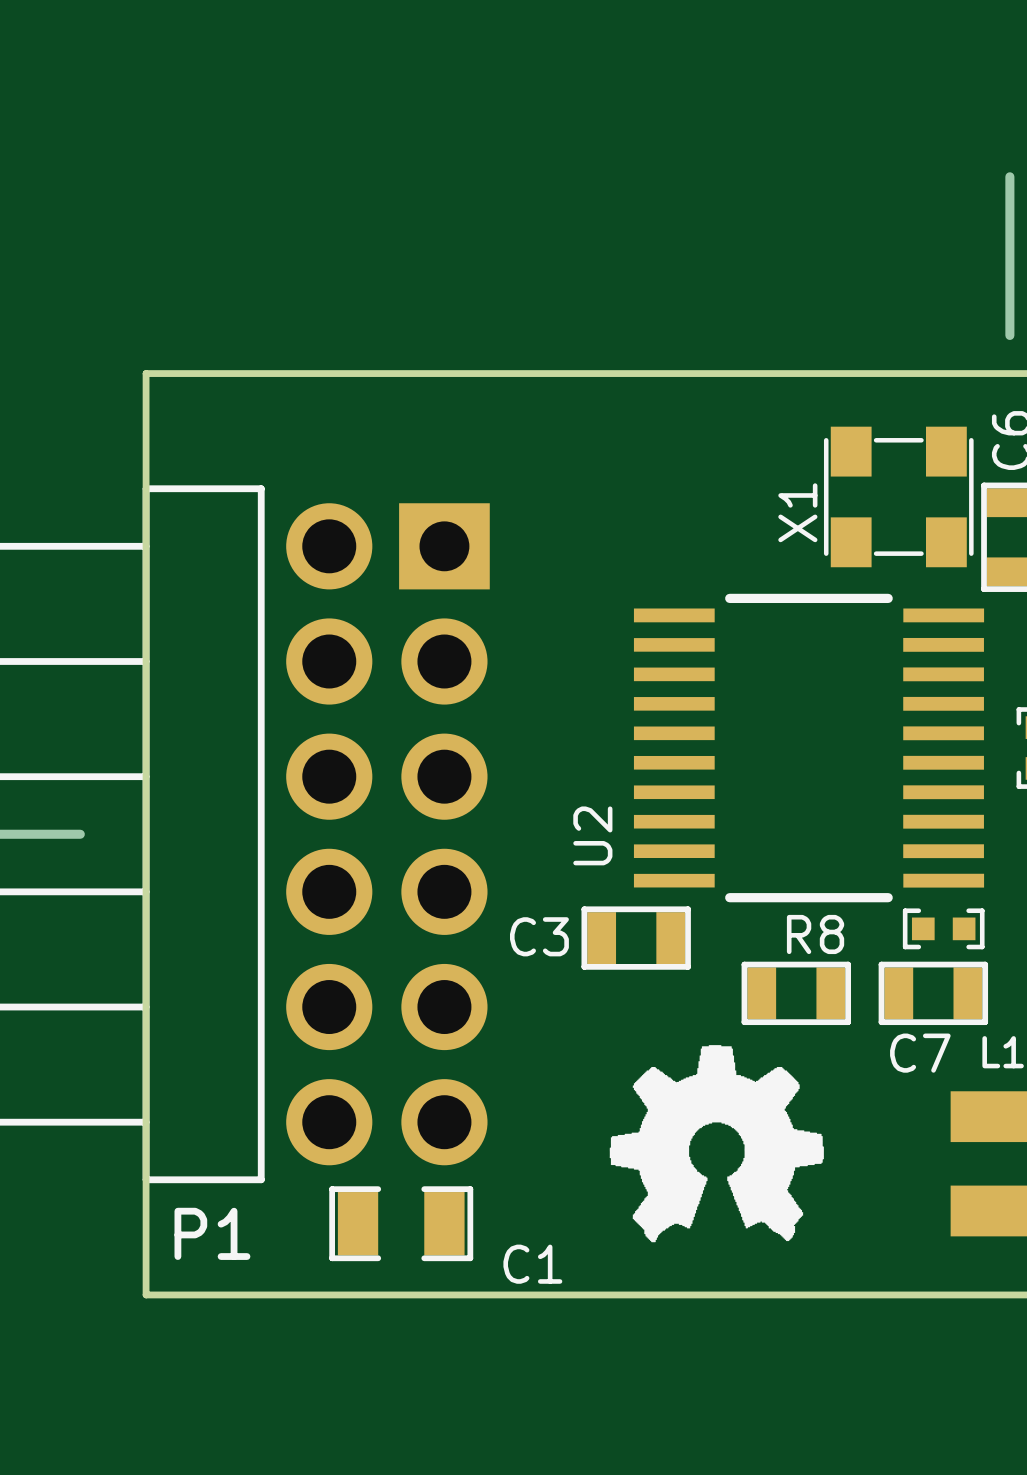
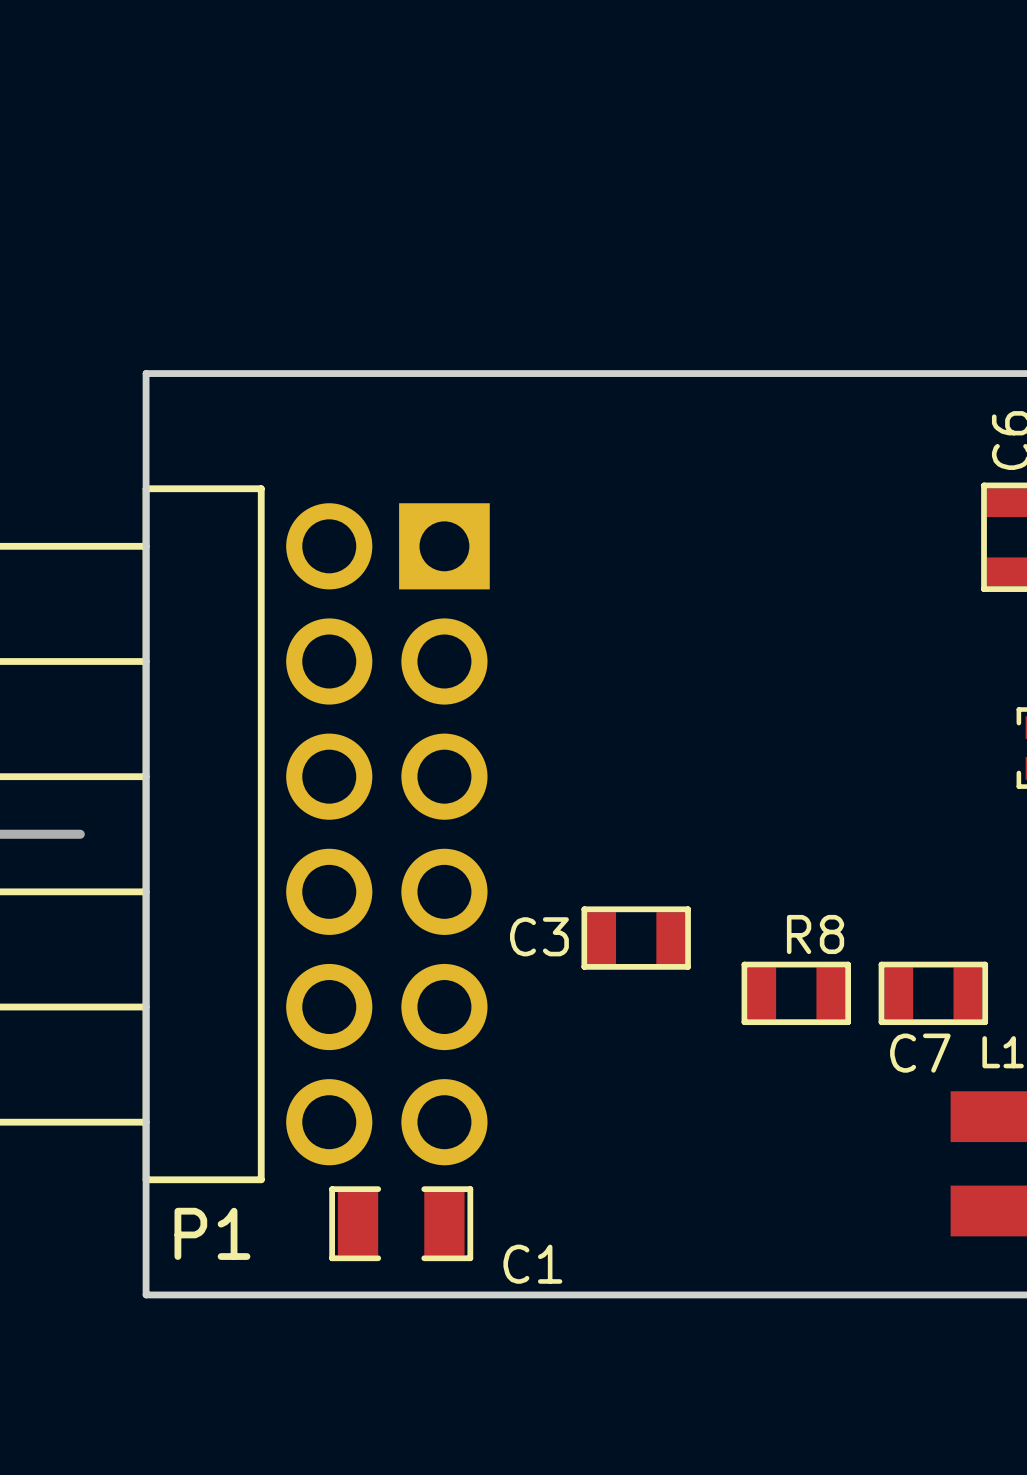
line: (1009, 176) (1009, 335) -> none
X1: (898, 496) -> none
U2: (809, 748) -> none
part: (943, 928) -> none
drawing: [609, 1045, 824, 1243] -> none

